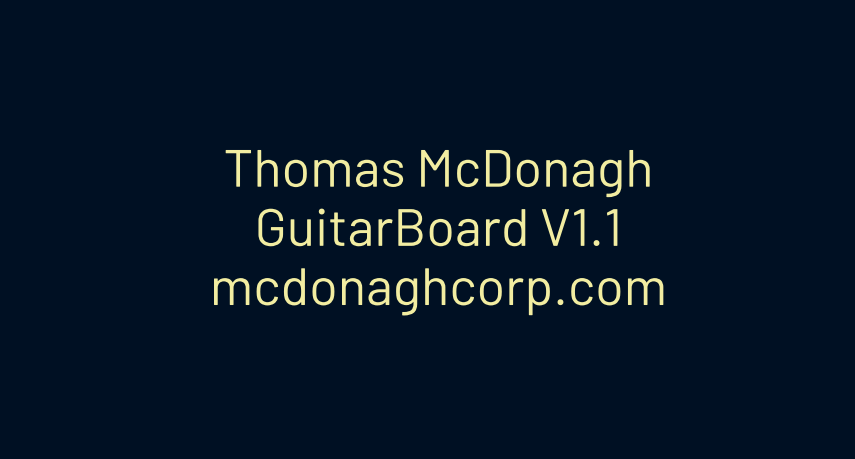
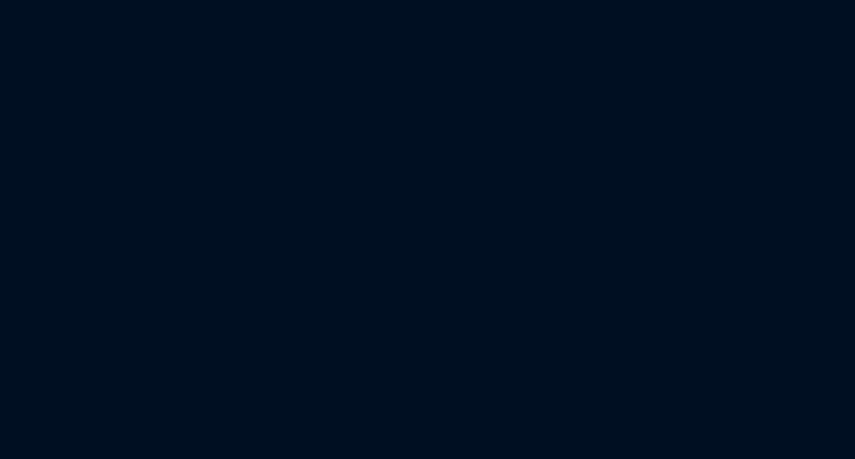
text: Thomas McDonagh (437, 173) -> none
text: GuitarBoard V1.1 (437, 227) -> none
text: mcdonaghcorp.com (438, 291) -> none

